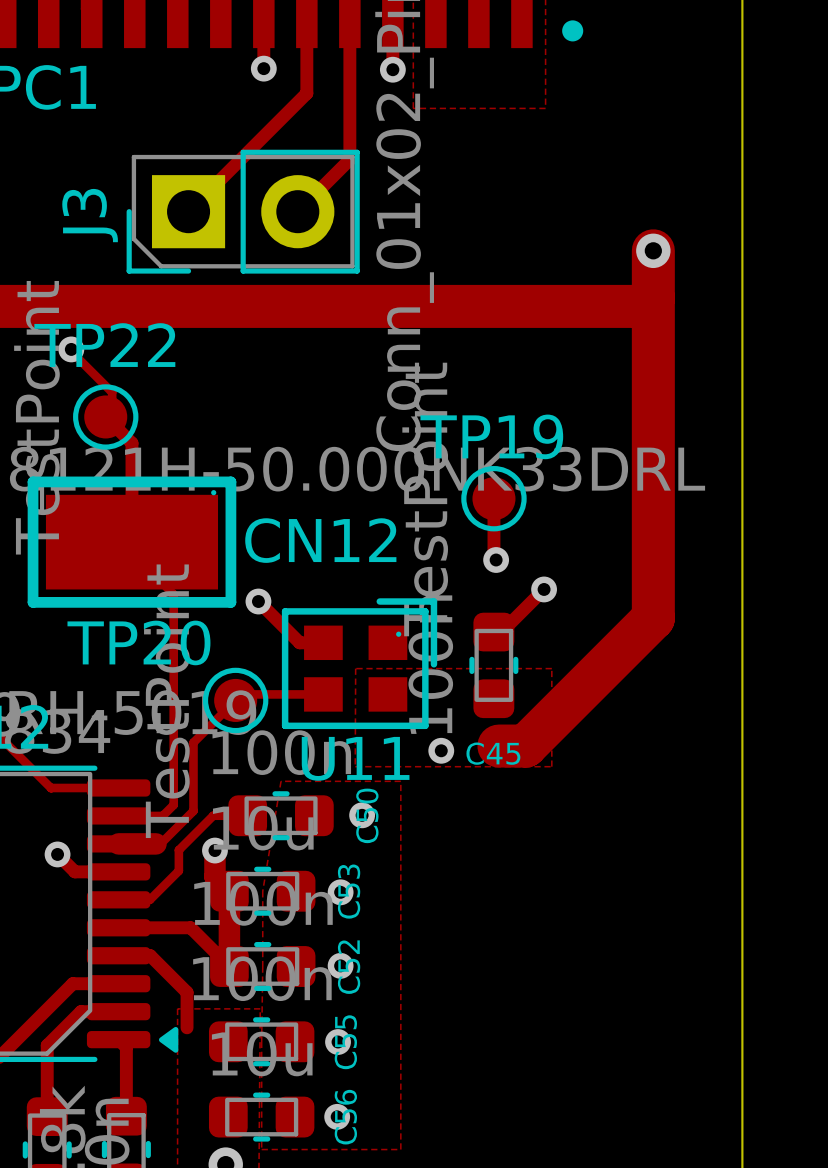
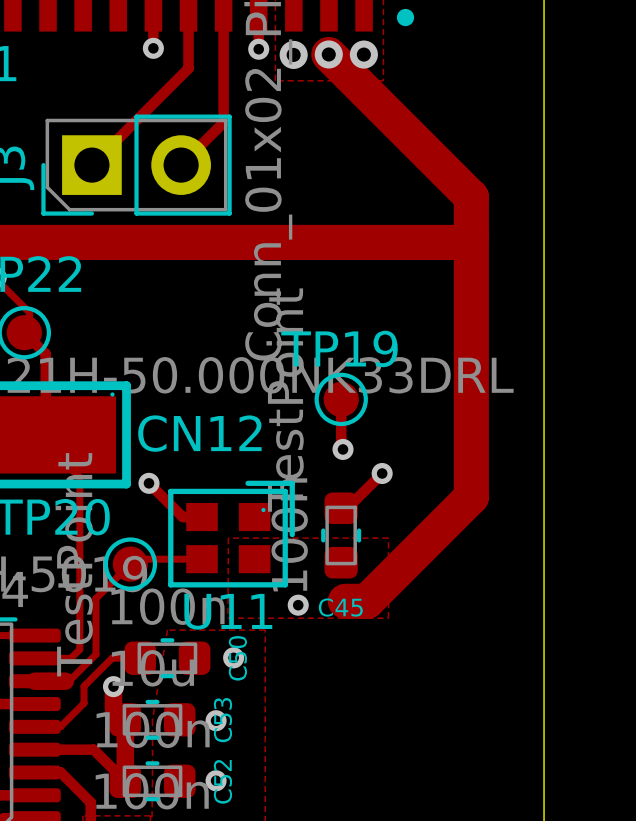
via: none -> (293, 54)
track: none -> (328, 54) (471, 197)
via: none -> (328, 54)
via: none -> (363, 54)
via: (653, 250) -> none

